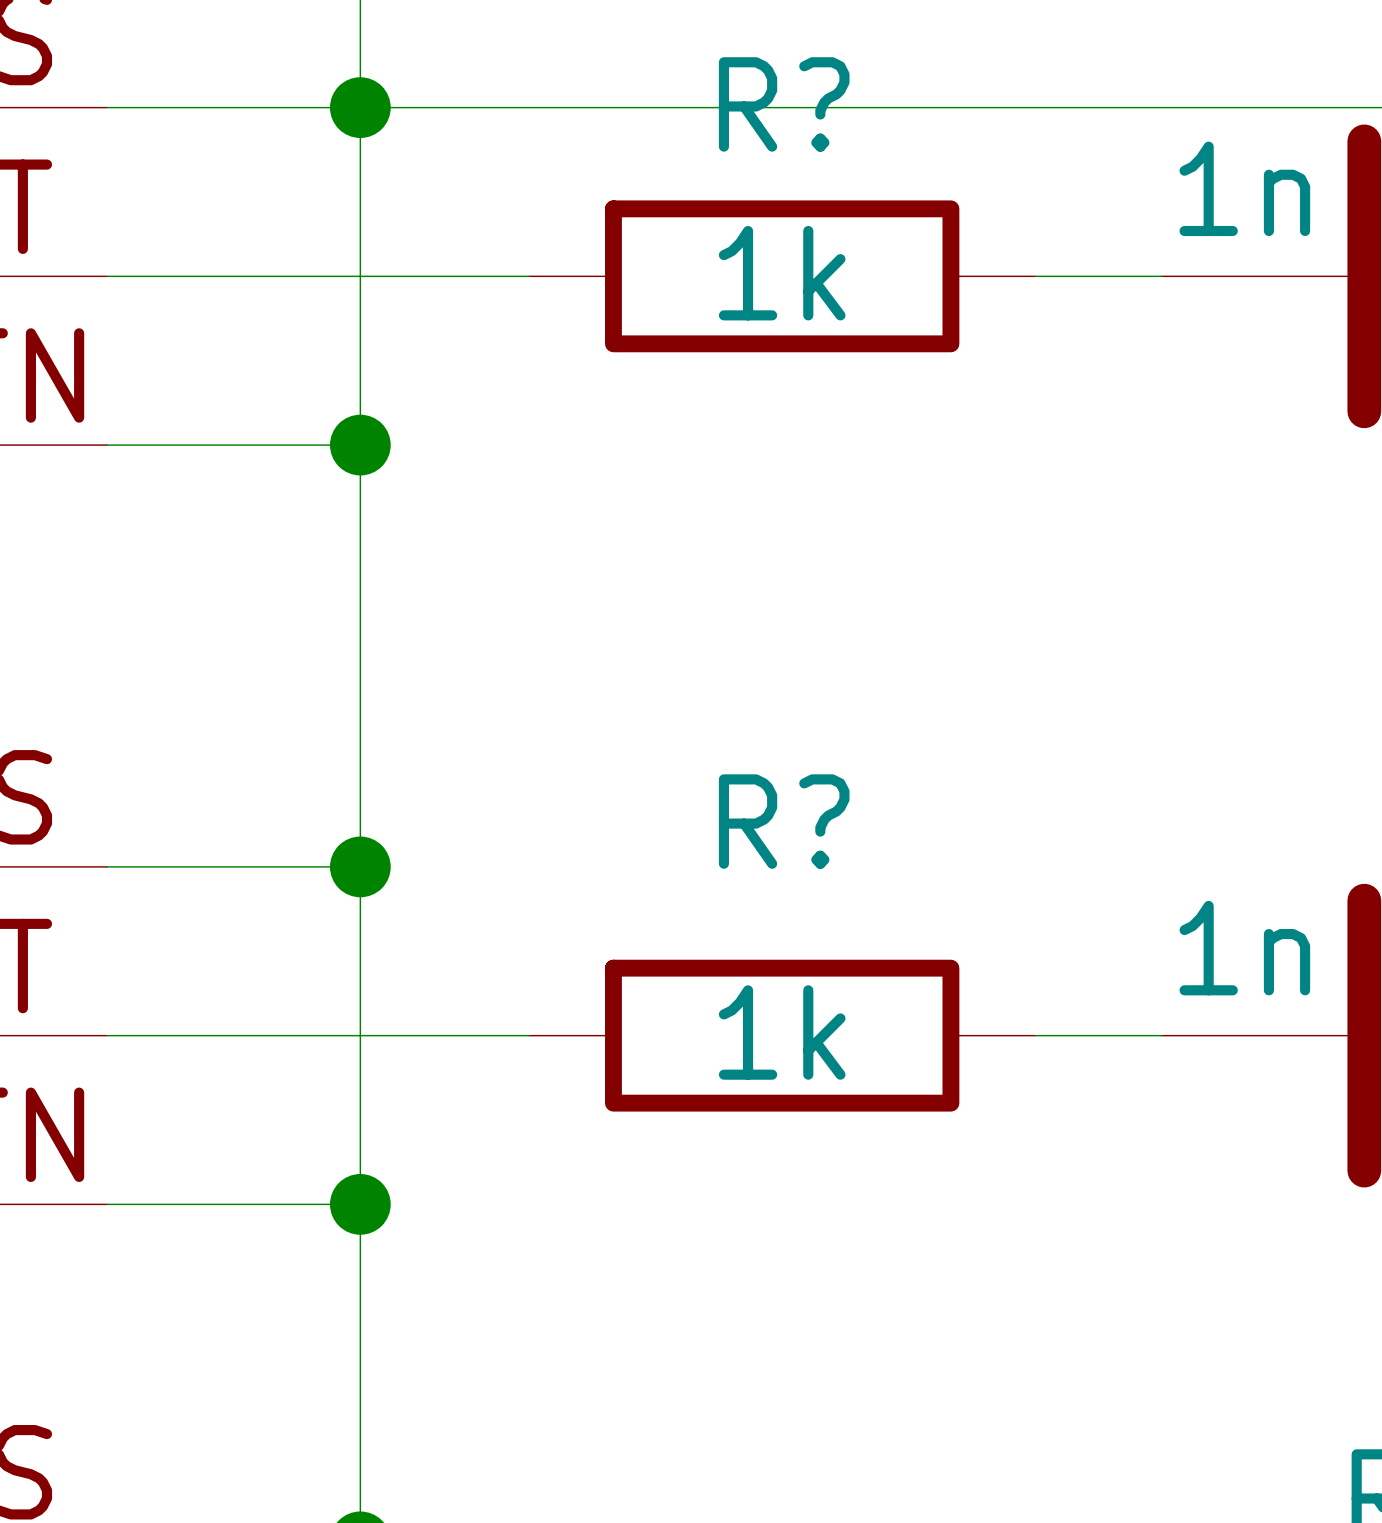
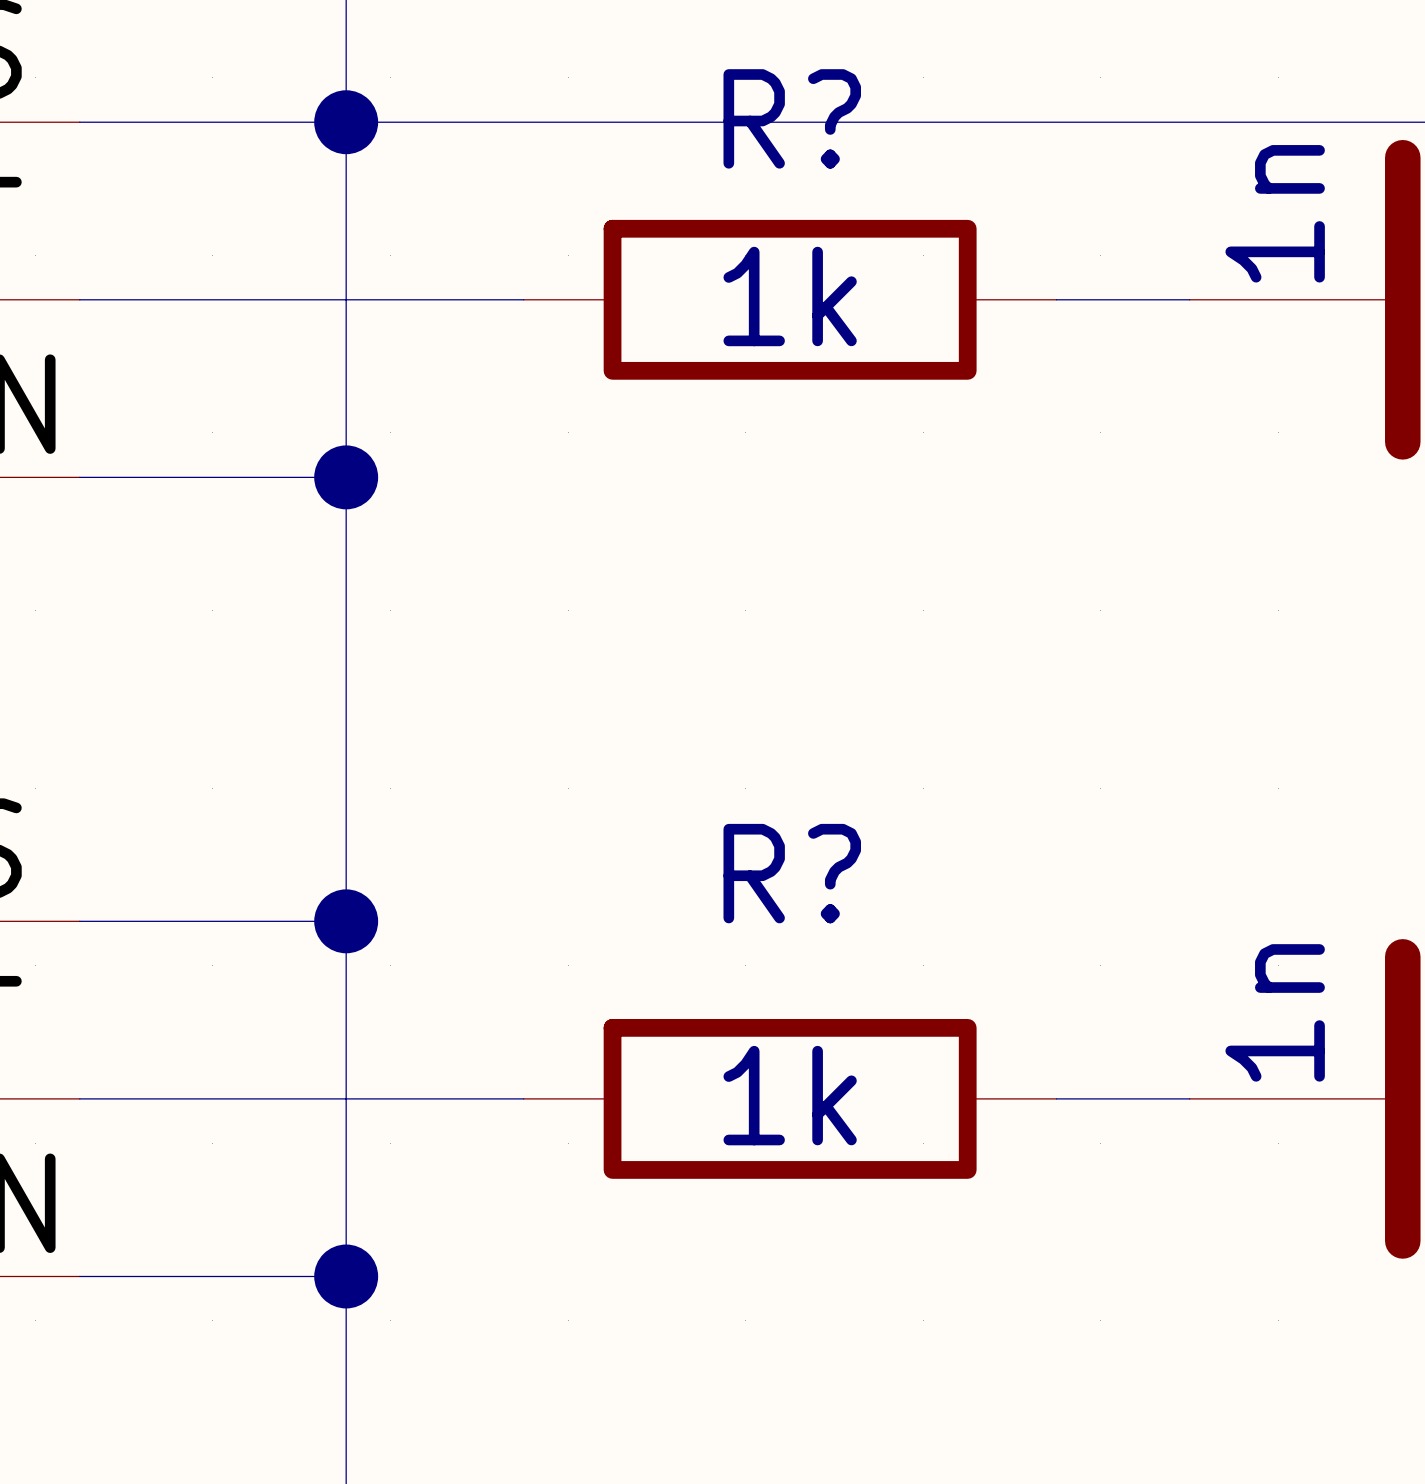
part value rotation: 0° (1244, 188) -> 90° counterclockwise (1275, 213)
part value rotation: 0° (1244, 948) -> 90° counterclockwise (1275, 1012)

